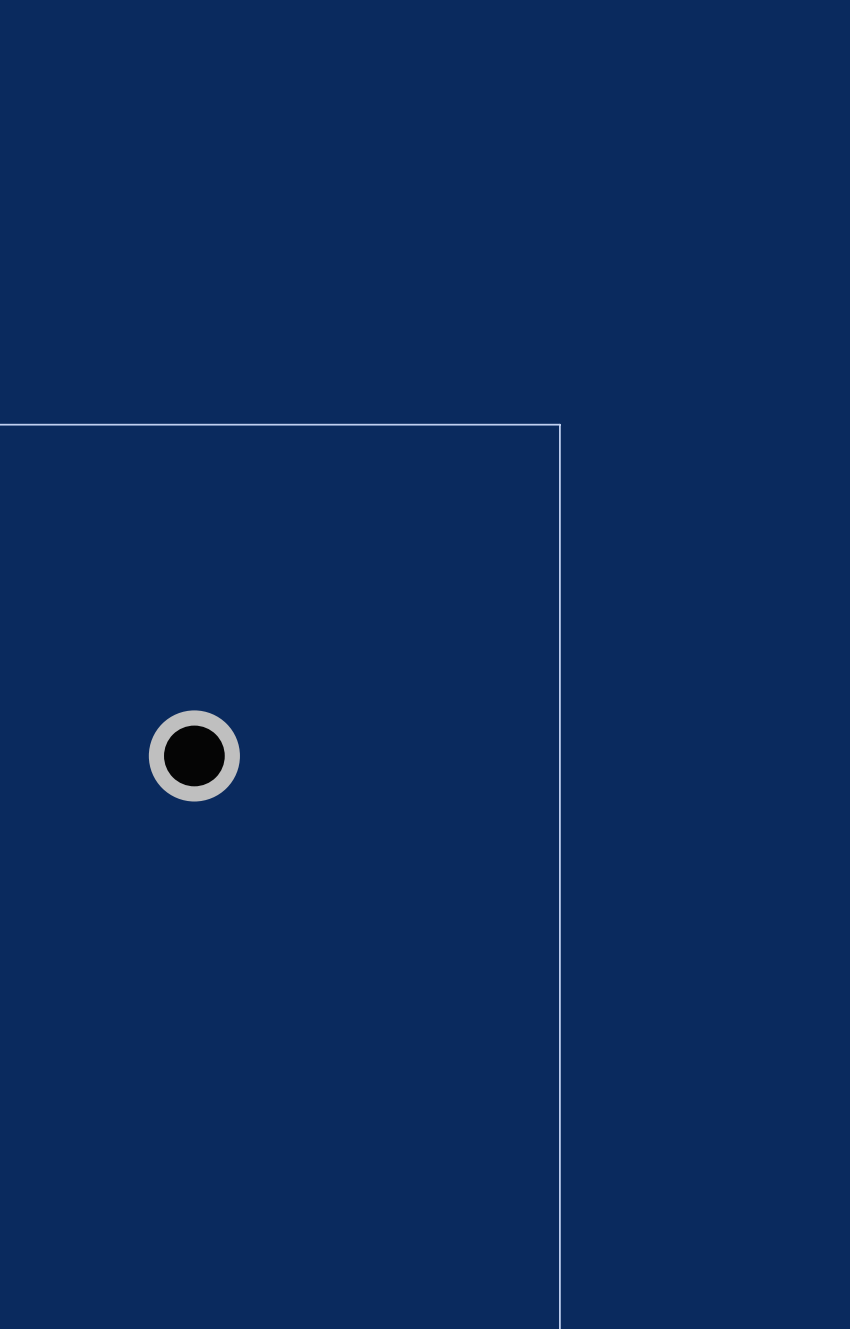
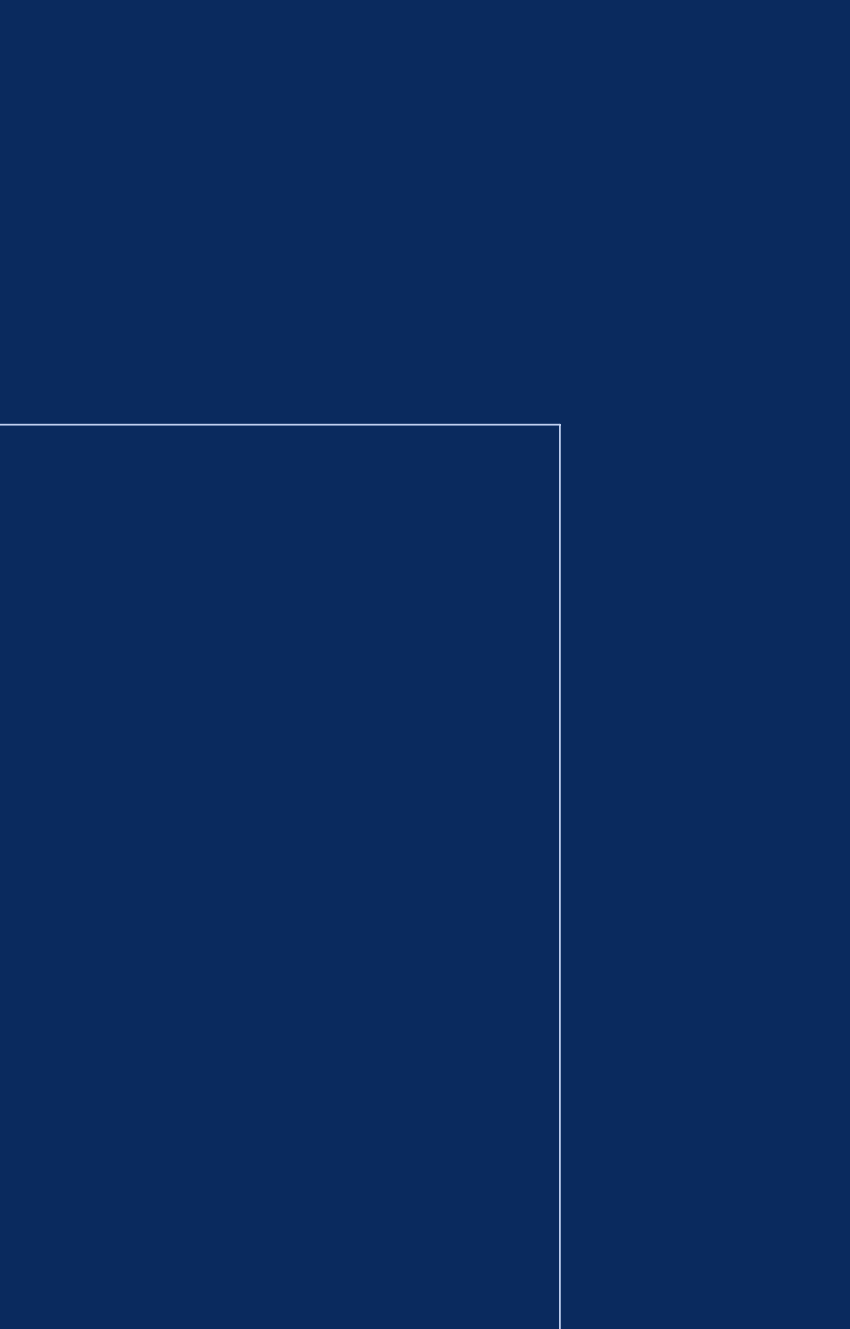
via: (194, 755) -> none

